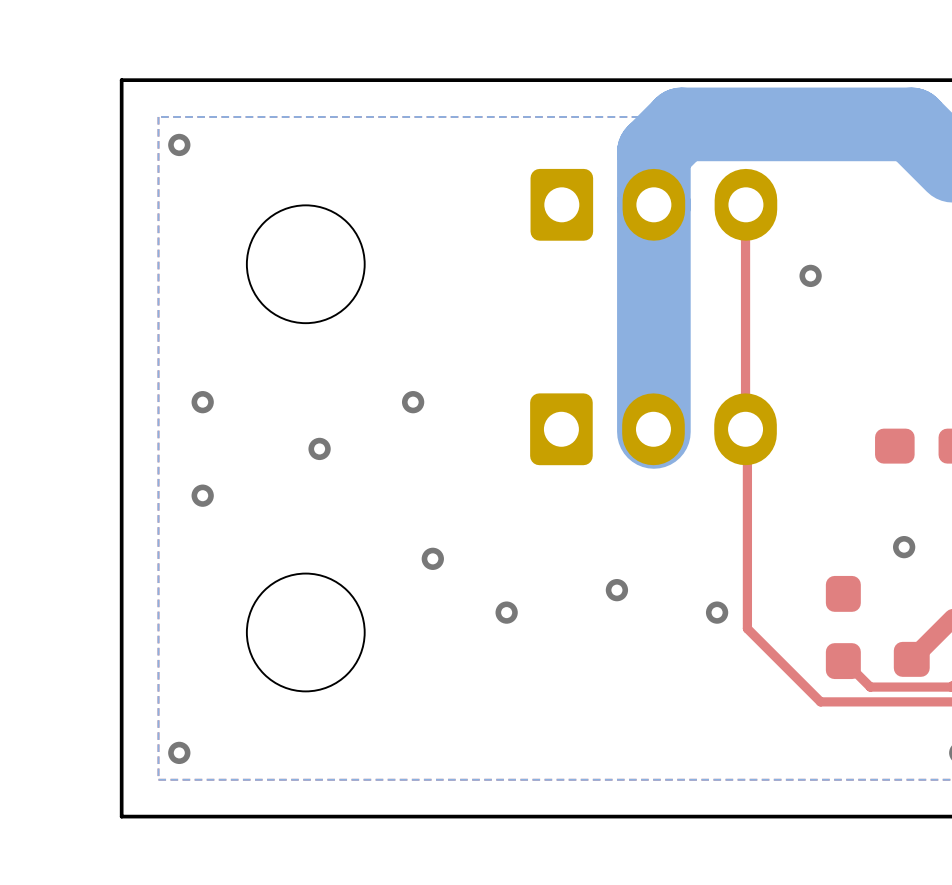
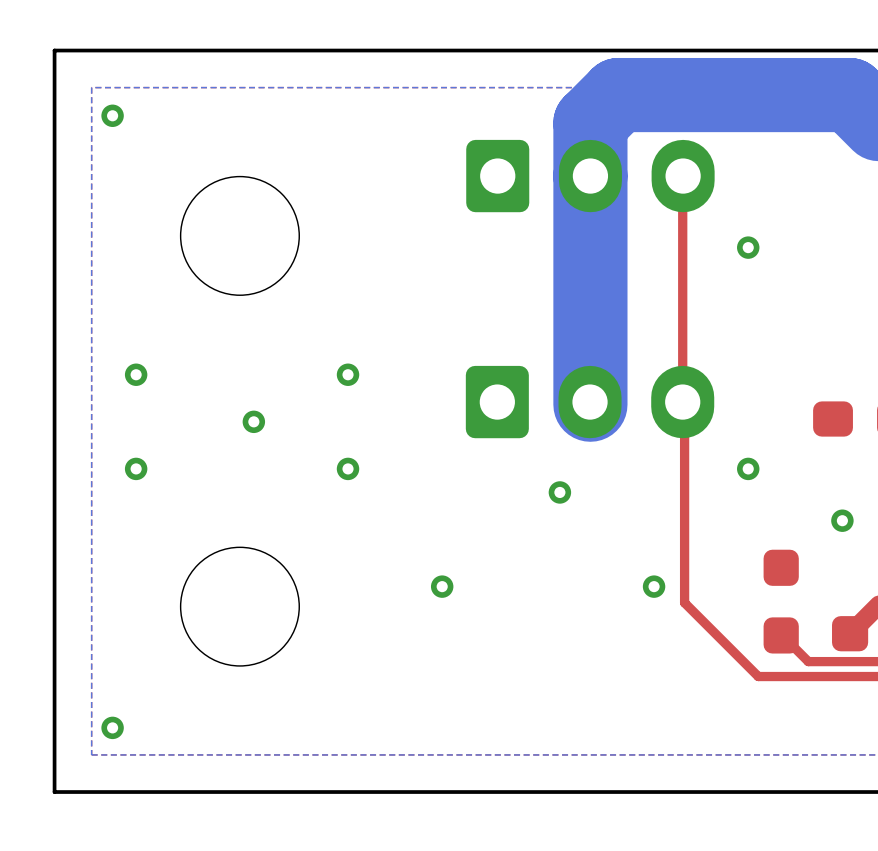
via: none -> (748, 468)
via position: (432, 558) -> (348, 468)
via position: (616, 590) -> (559, 492)

